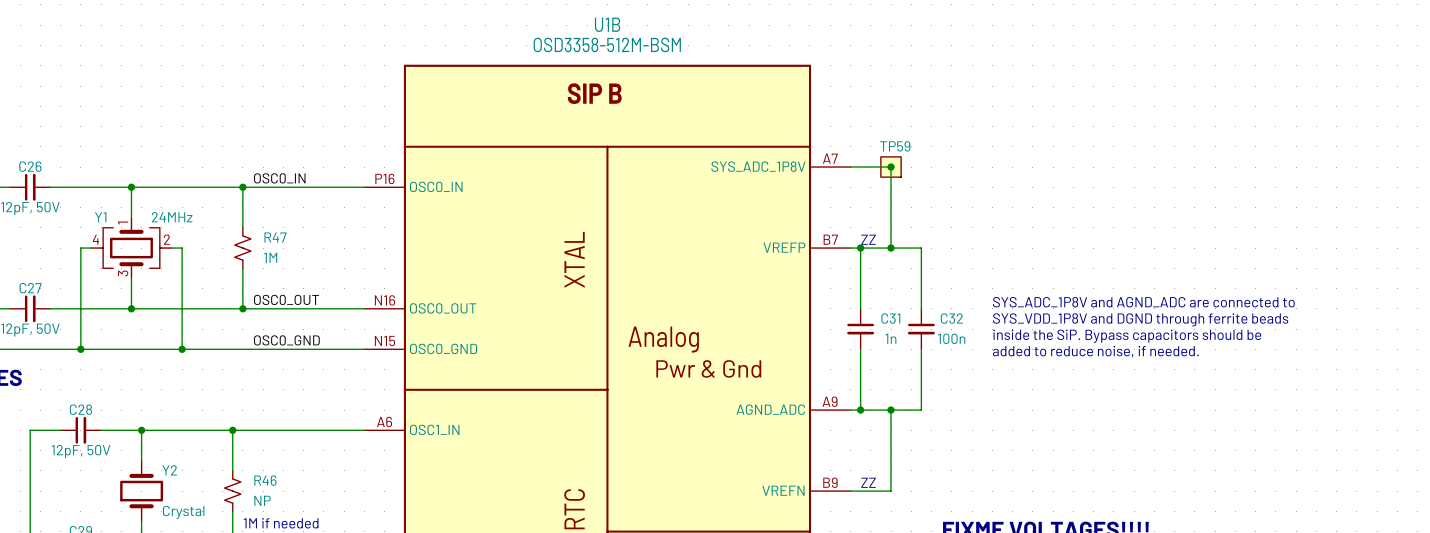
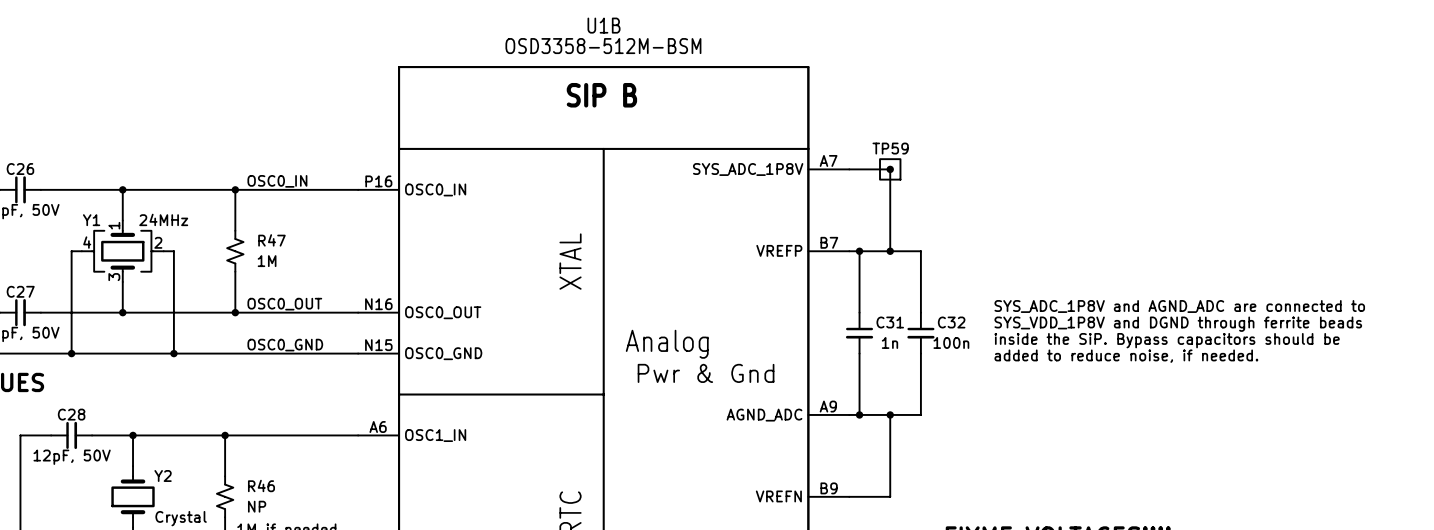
text: ZZ (868, 239) -> none
text: ZZ (868, 482) -> none

